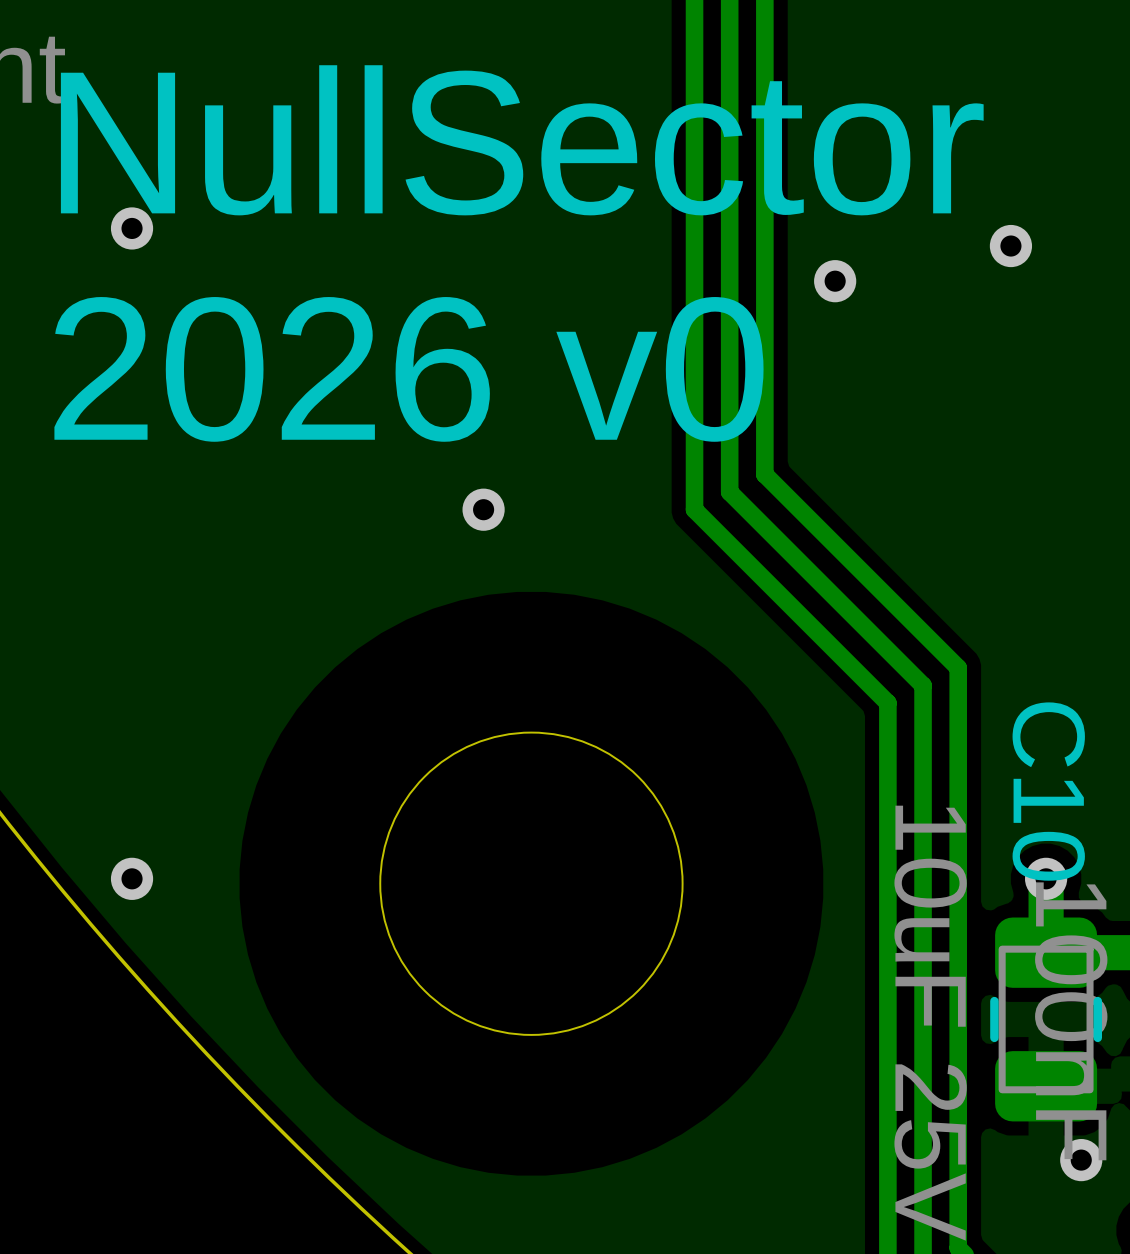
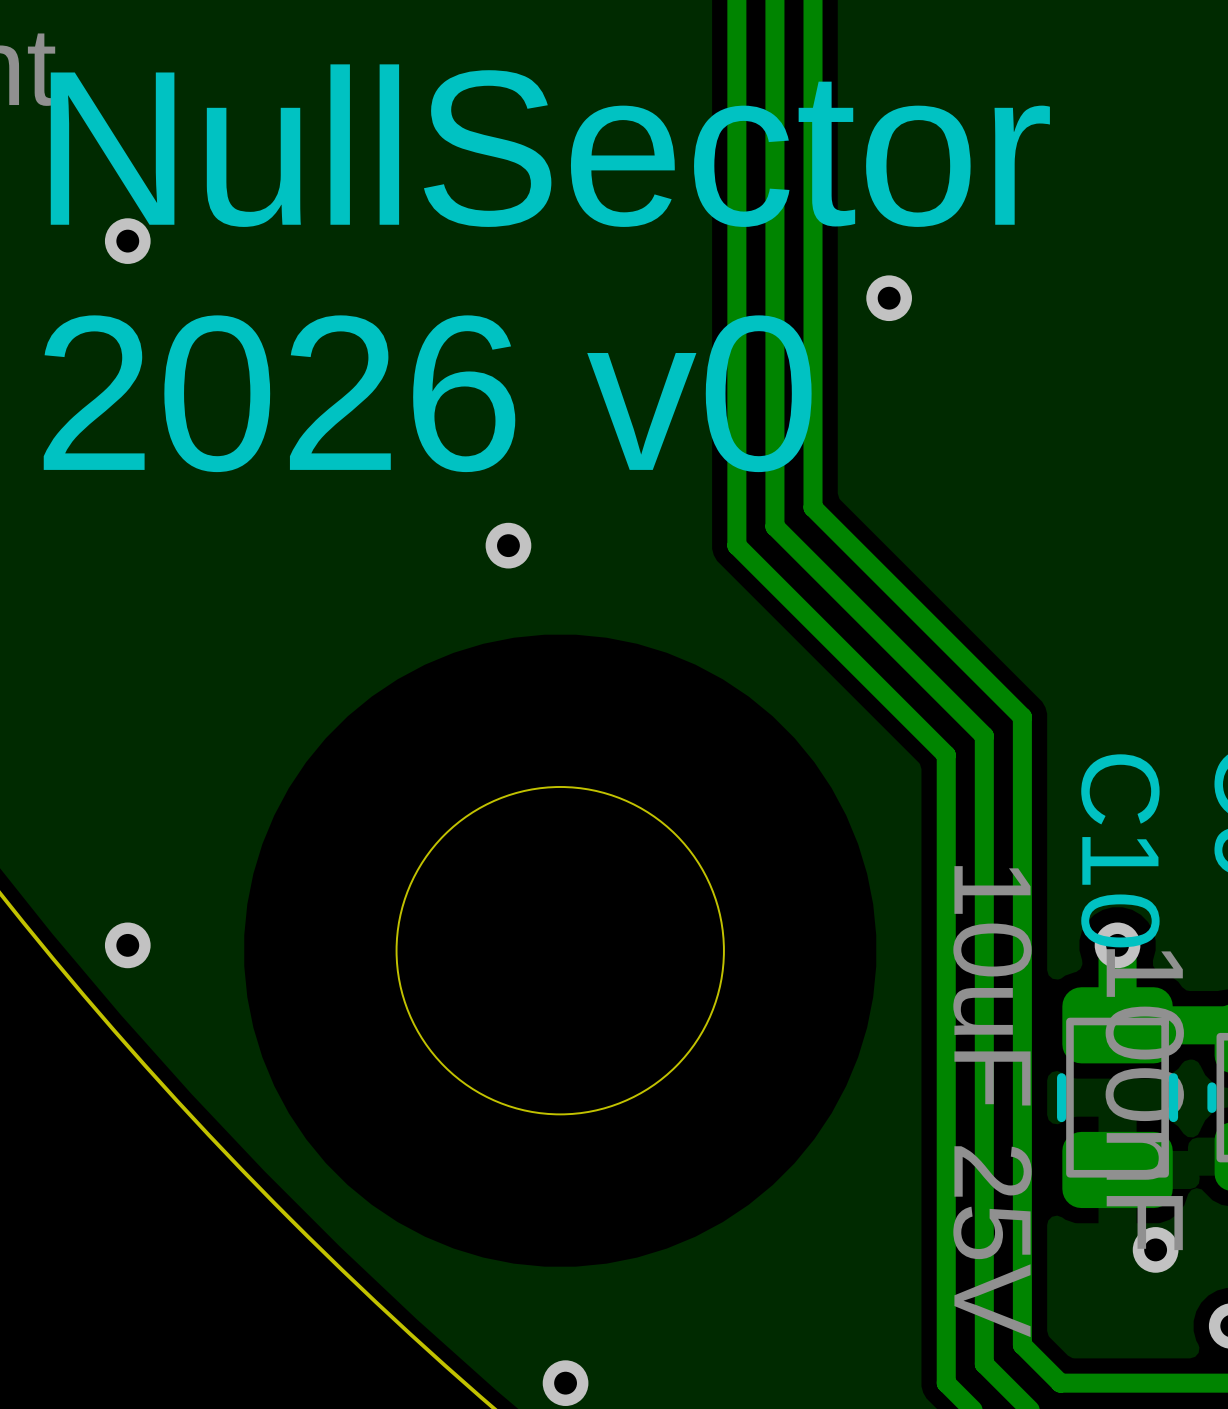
via: (1010, 246) -> none

